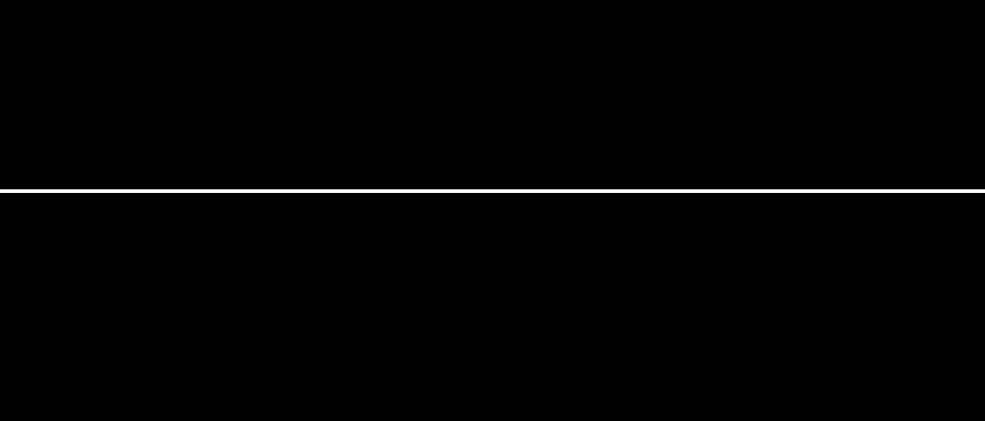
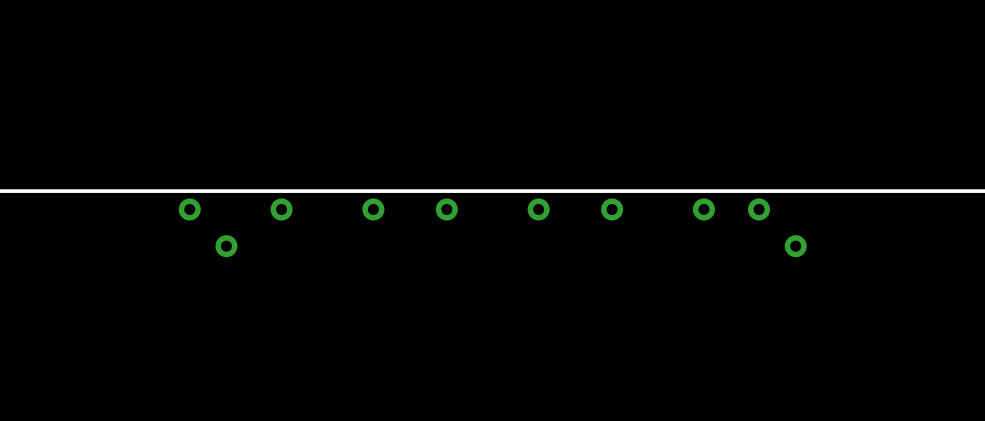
via: none -> (189, 209)
via: none -> (281, 209)
via: none -> (373, 209)
via: none -> (446, 209)
via: none -> (538, 209)
via: none -> (612, 209)
via: none -> (703, 209)
via: none -> (759, 209)
via: none -> (226, 246)
via: none -> (795, 246)

